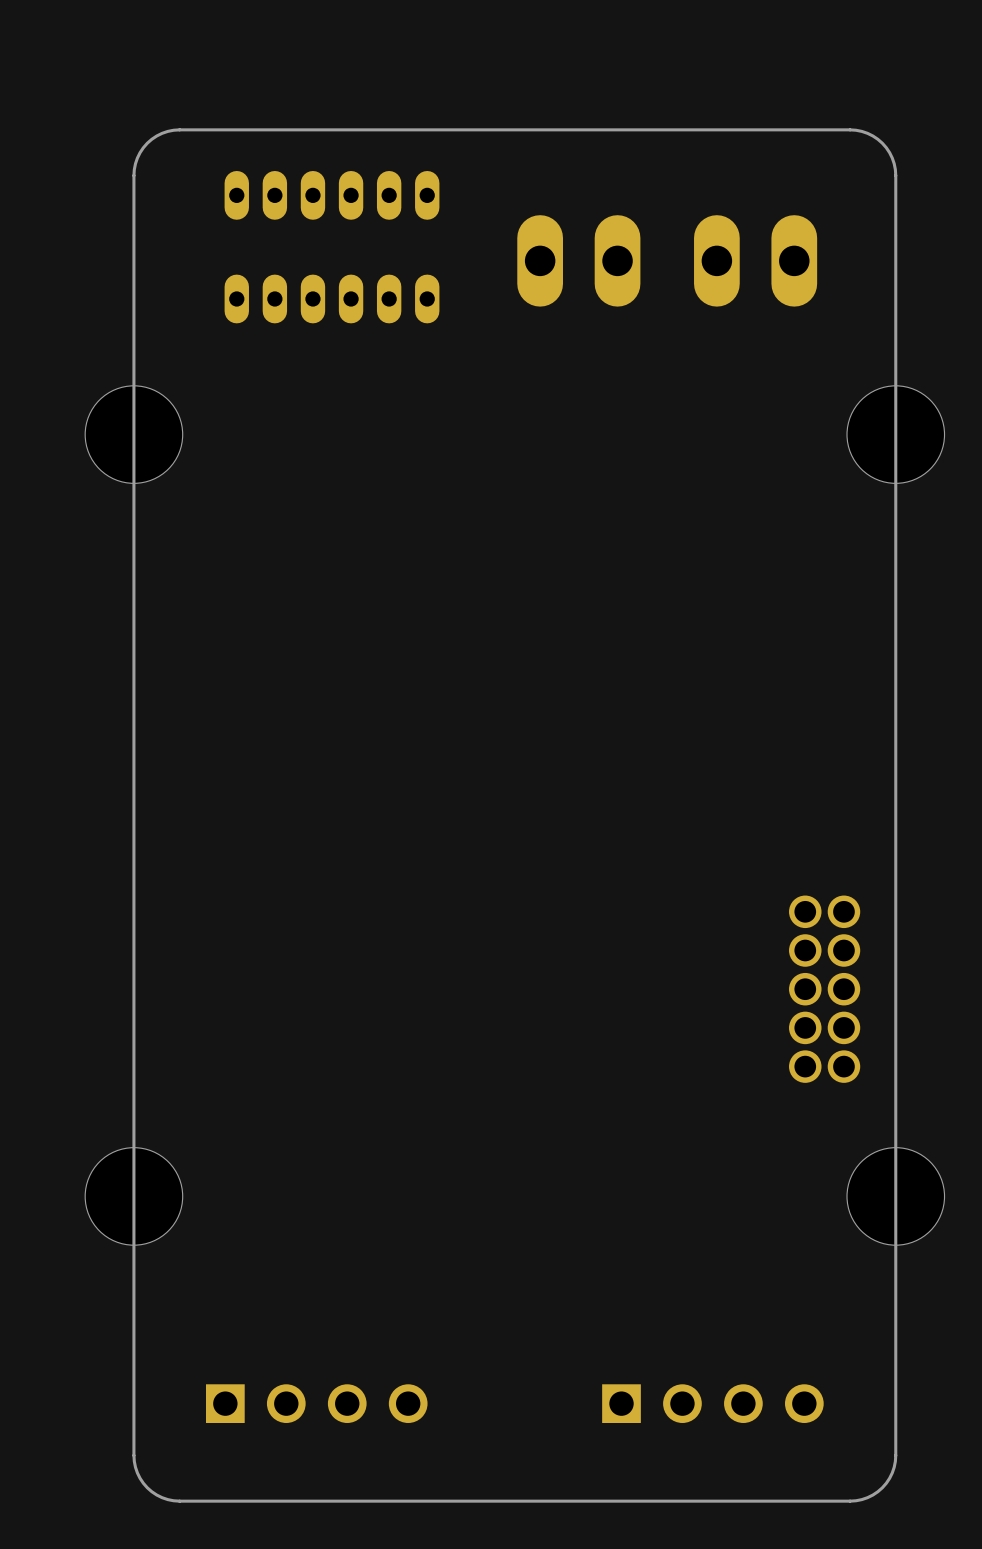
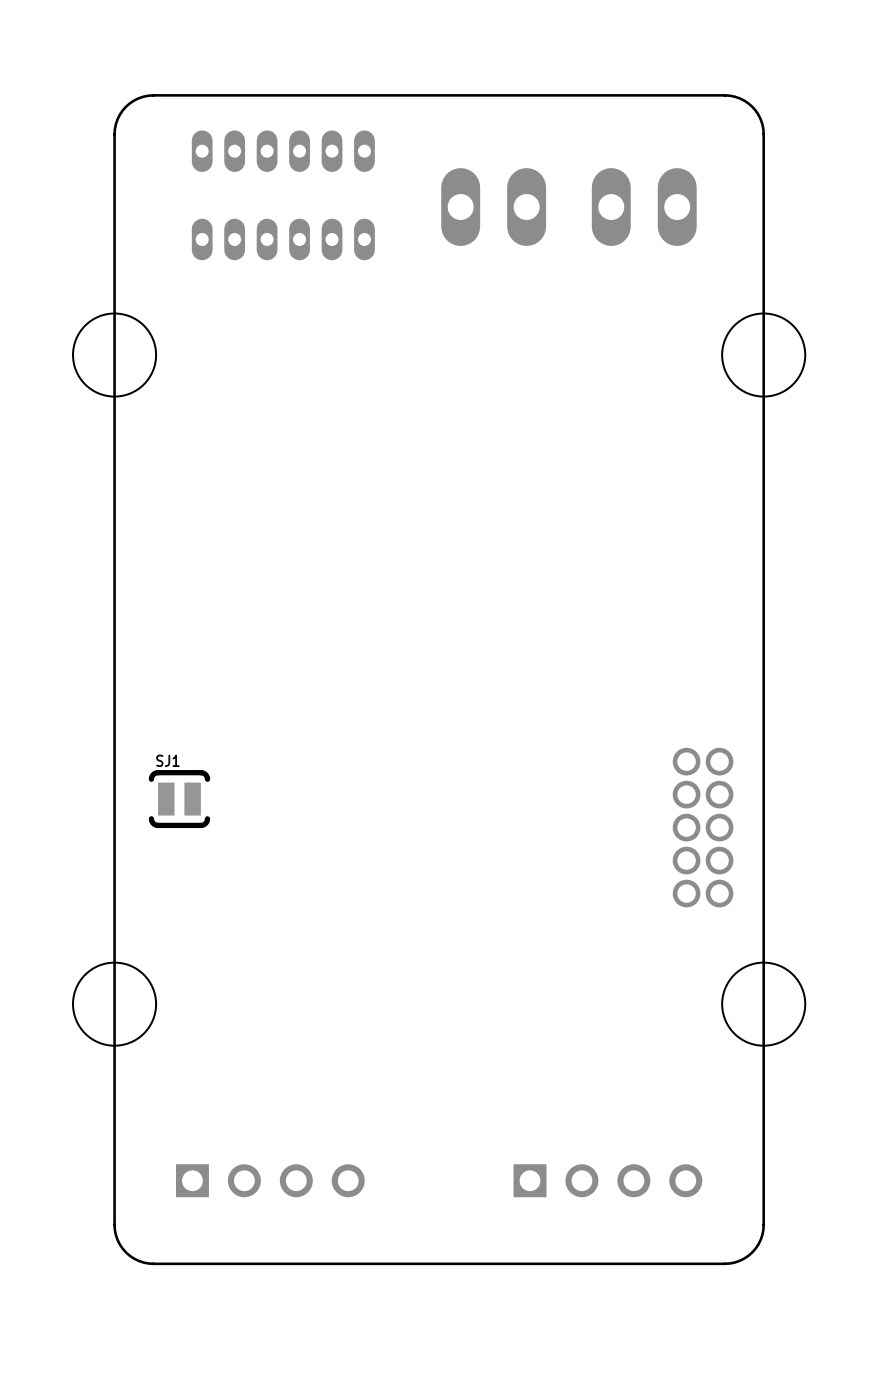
SJ1: none -> (179, 799)

